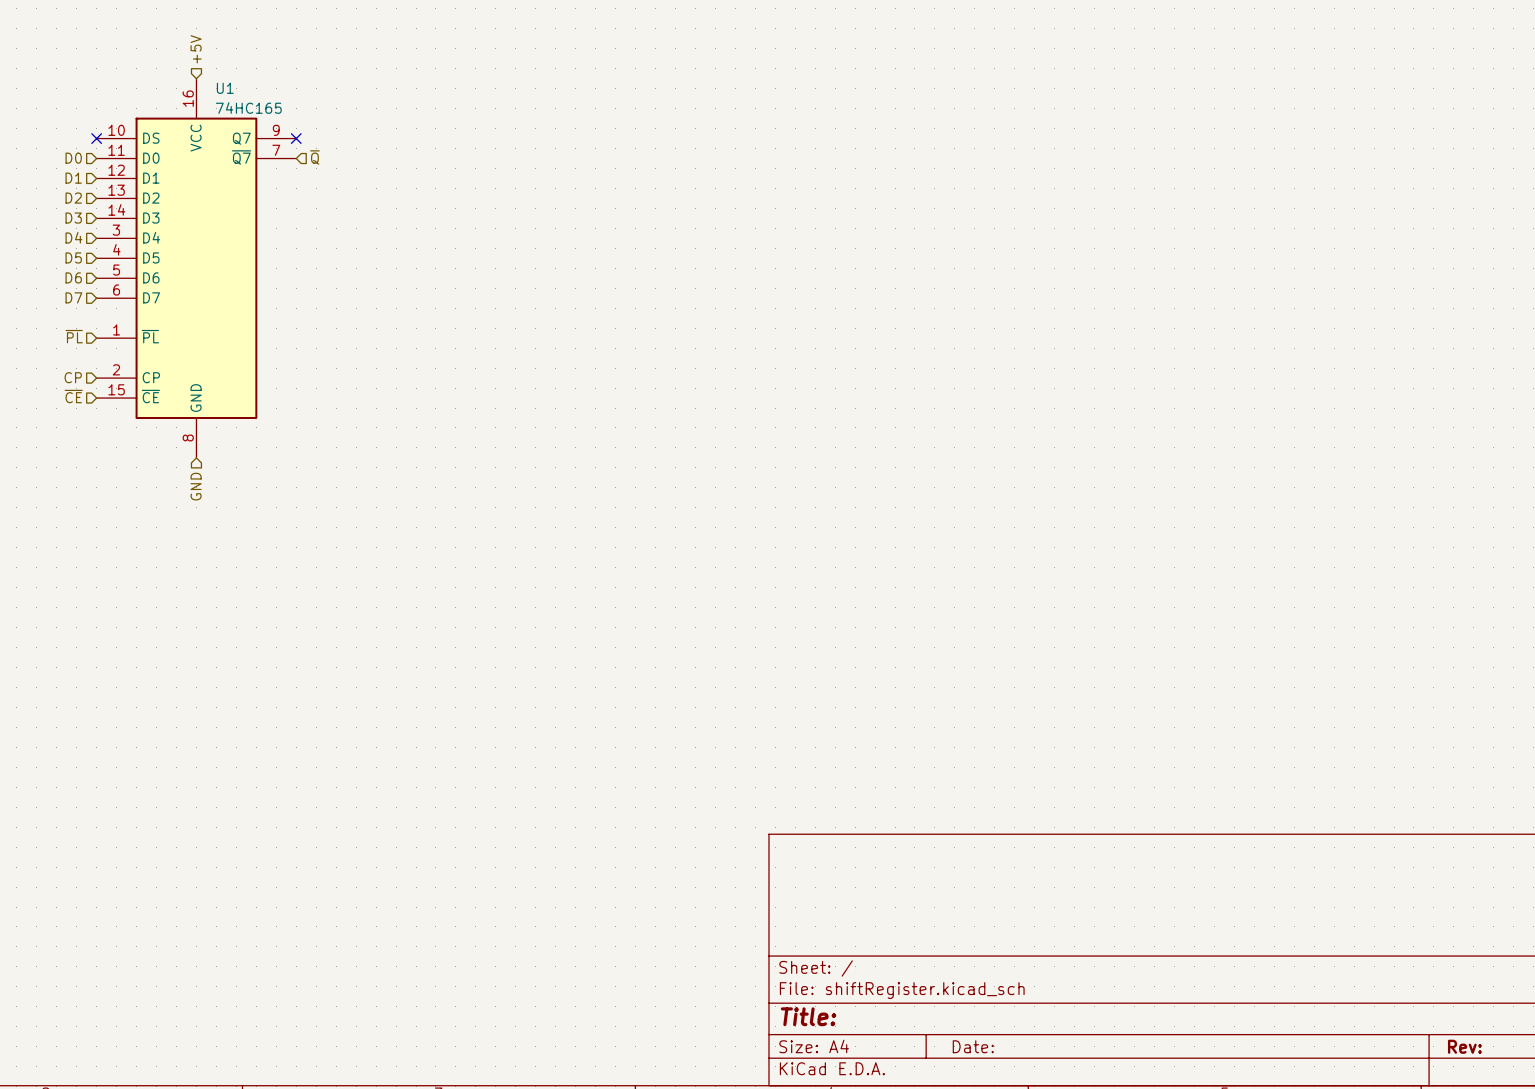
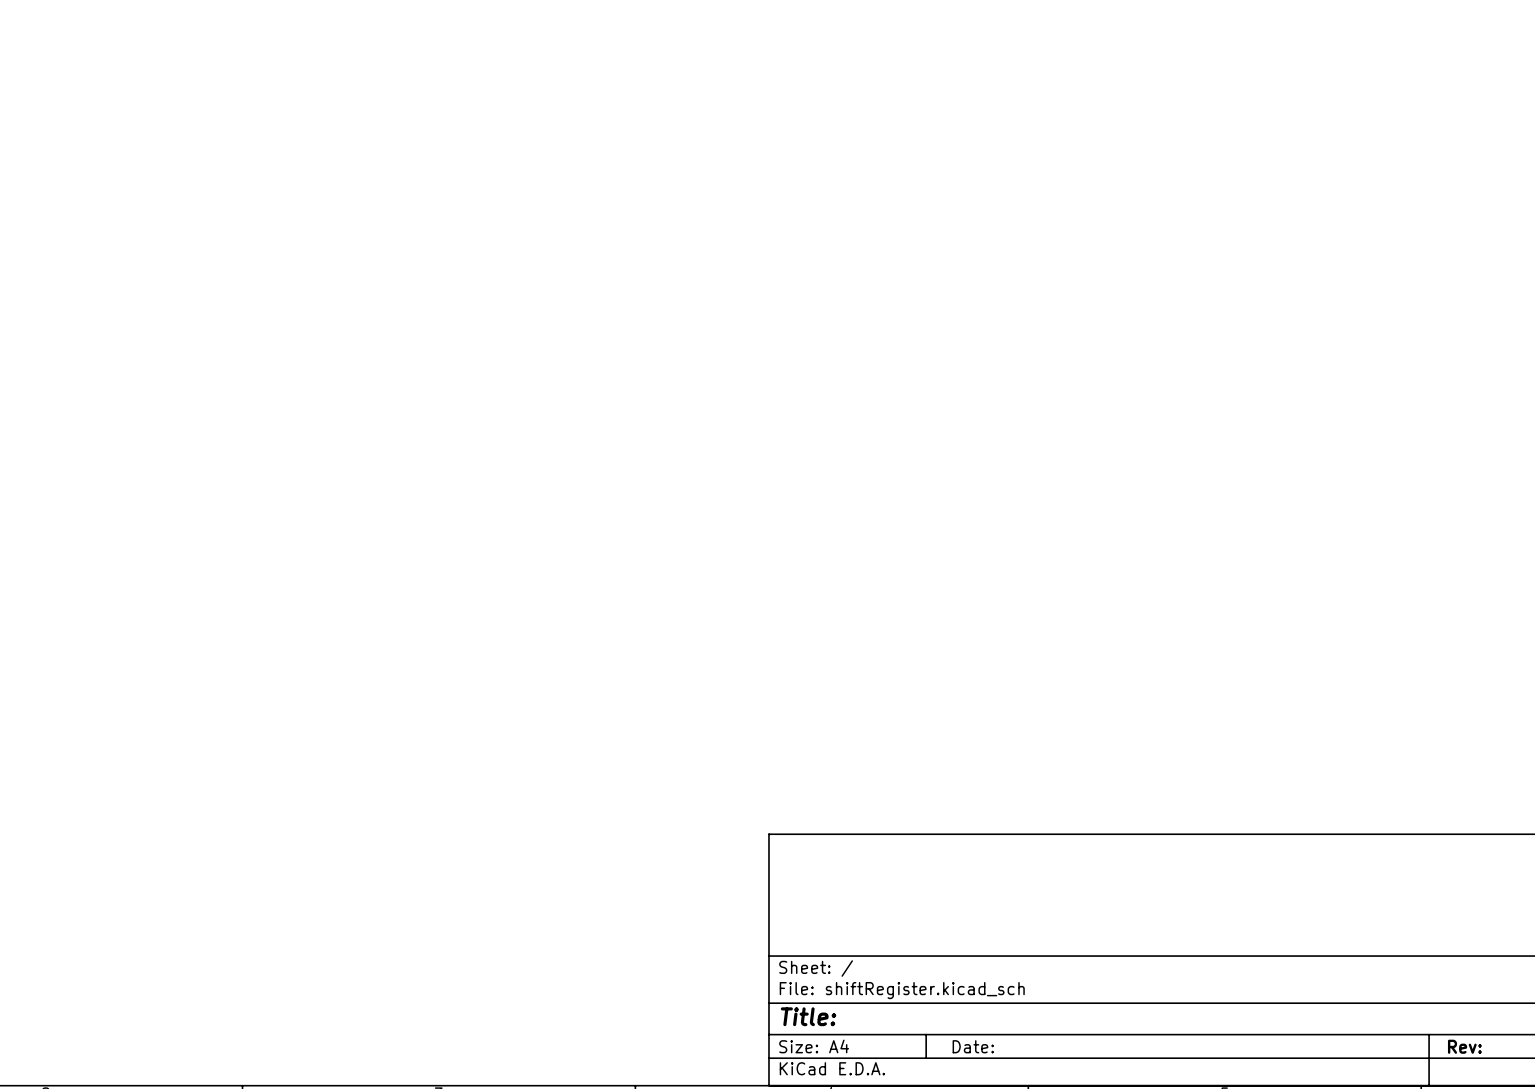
hierarchical label: +5V (196, 49) -> none
no-connect mark: (96, 138) -> none
no-connect mark: (296, 138) -> none
hierarchical label: ~{Q} (314, 157) -> none
hierarchical label: D0 (73, 158) -> none
hierarchical label: D1 (73, 178) -> none
hierarchical label: D2 (73, 198) -> none
hierarchical label: D3 (73, 218) -> none
hierarchical label: D4 (73, 237) -> none
hierarchical label: D5 (73, 257) -> none
U1: 74HC165 (196, 268) -> none
hierarchical label: D6 (73, 277) -> none
hierarchical label: D7 (73, 297) -> none
hierarchical label: ~{PL} (74, 336) -> none
hierarchical label: CP (73, 377) -> none
hierarchical label: ~{CE} (73, 396) -> none
hierarchical label: GND (196, 486) -> none

